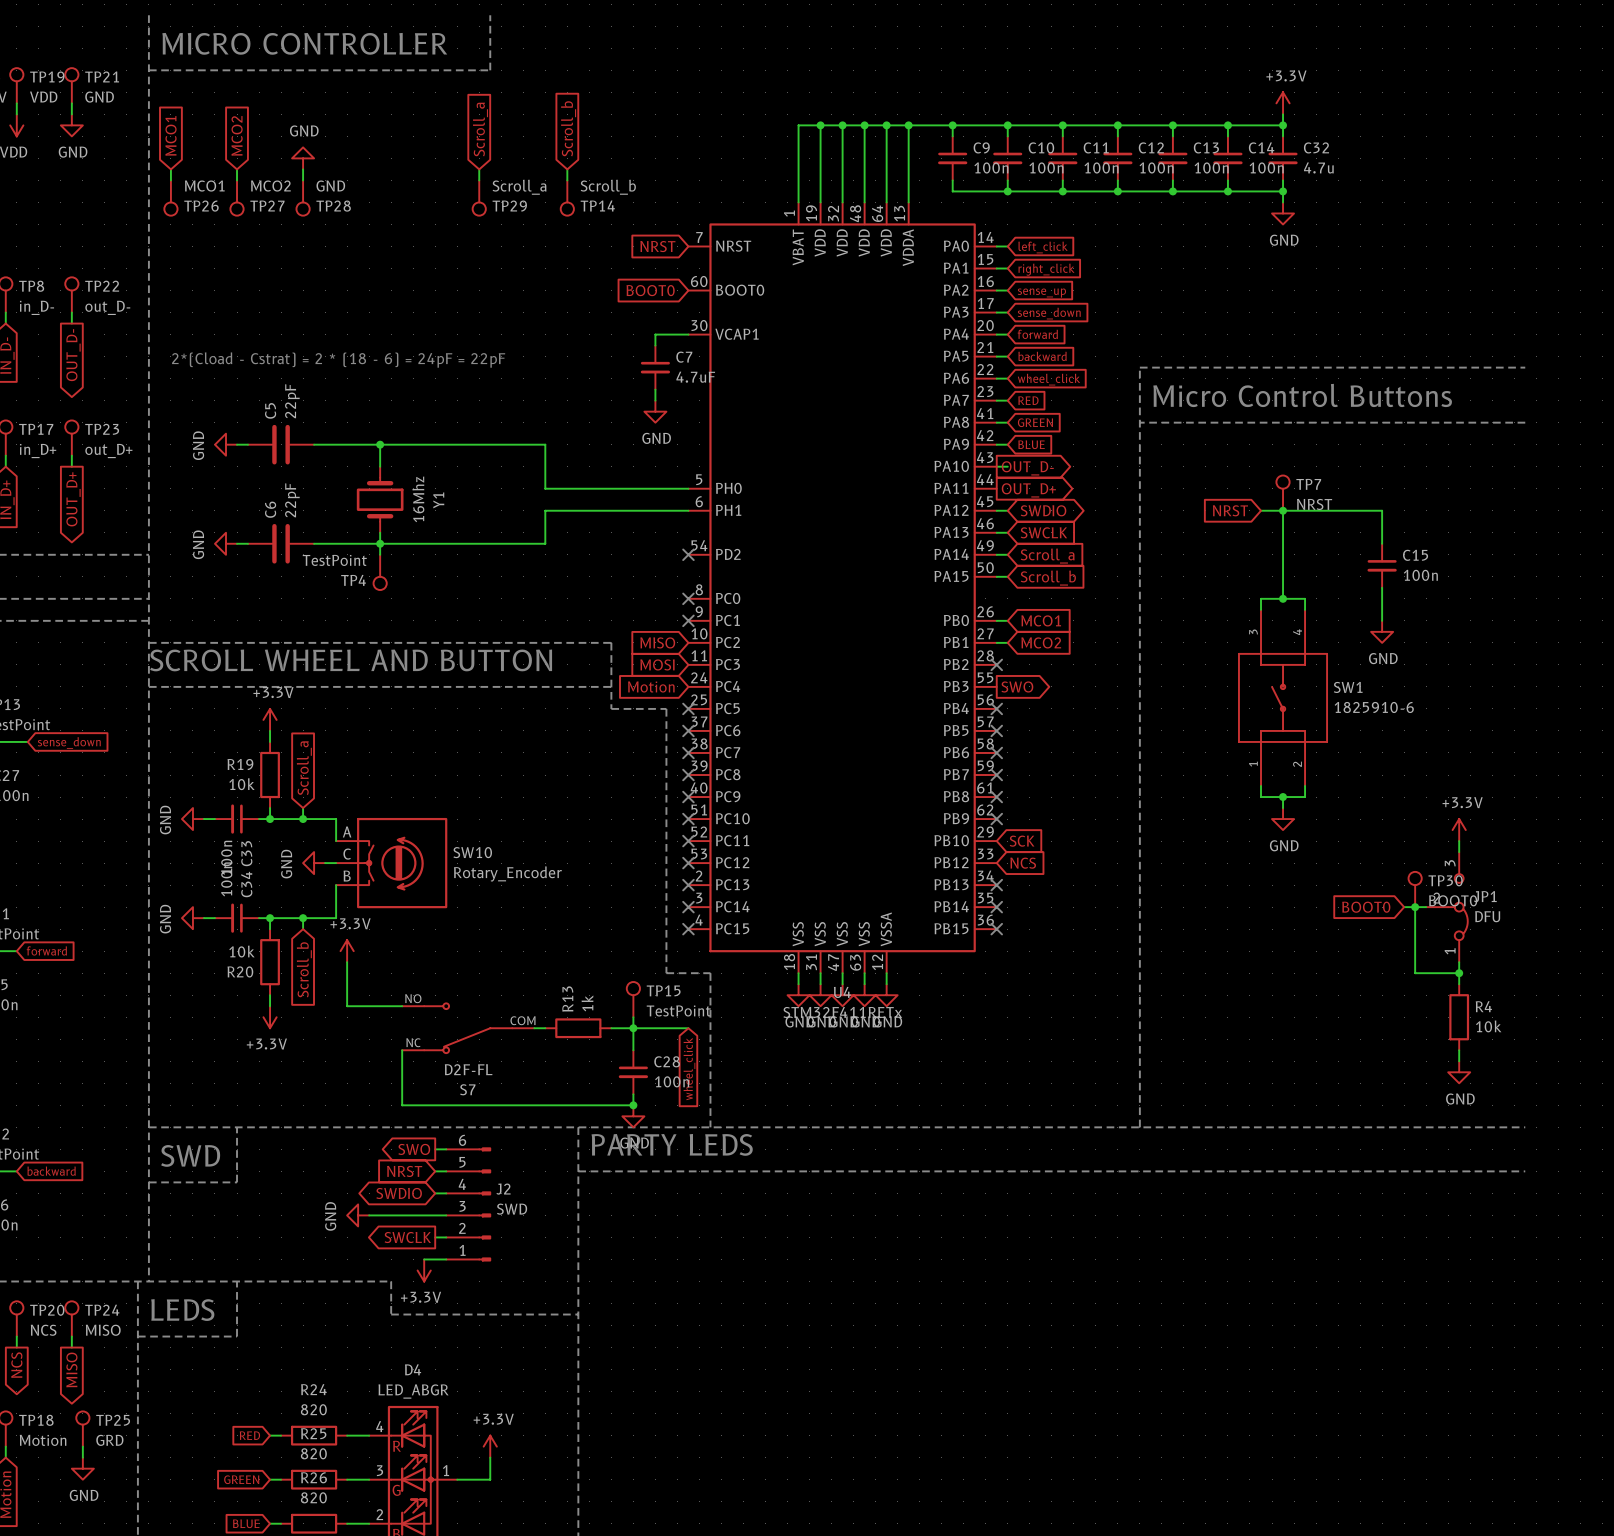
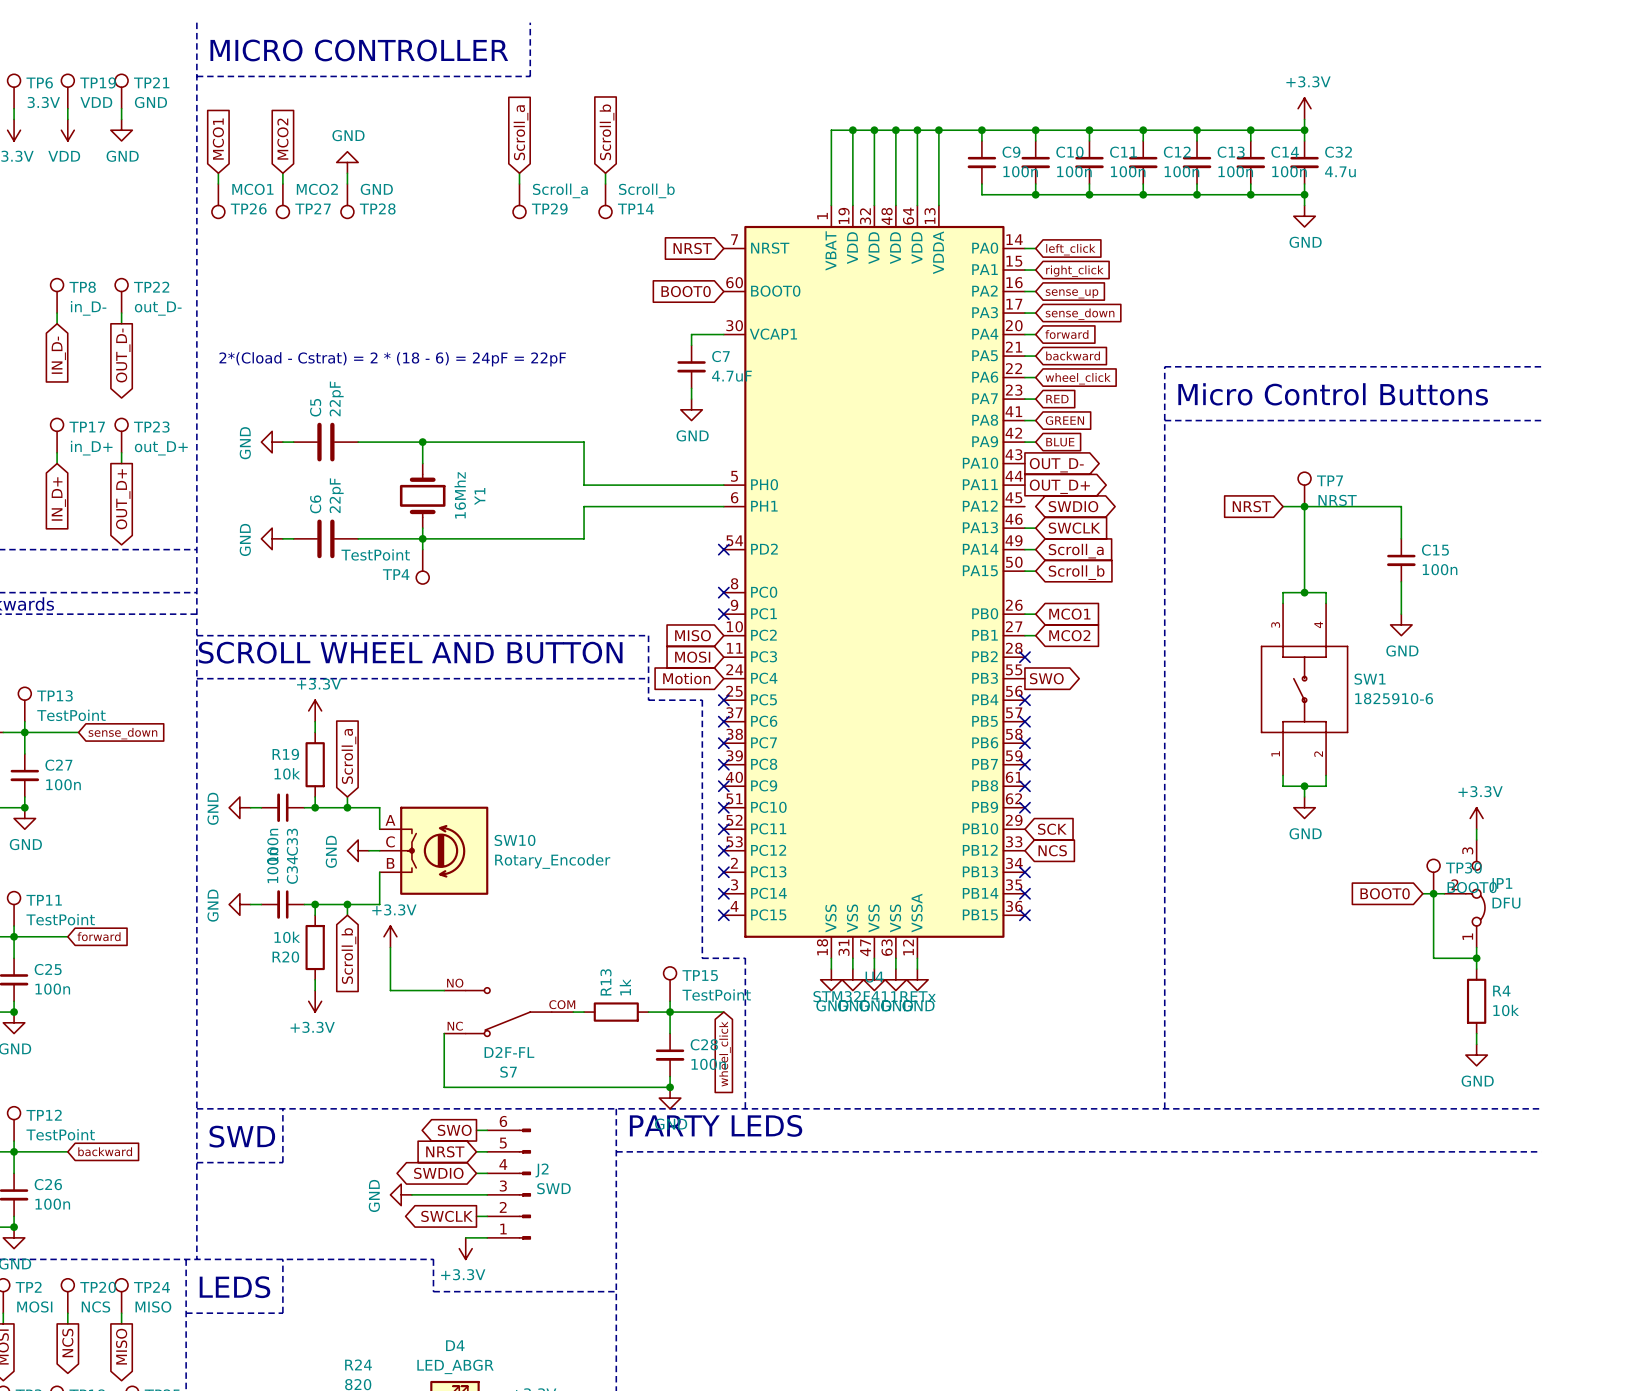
wire: (996, 466) (1007, 466) -> none
wire: (996, 510) (1007, 510) -> none

